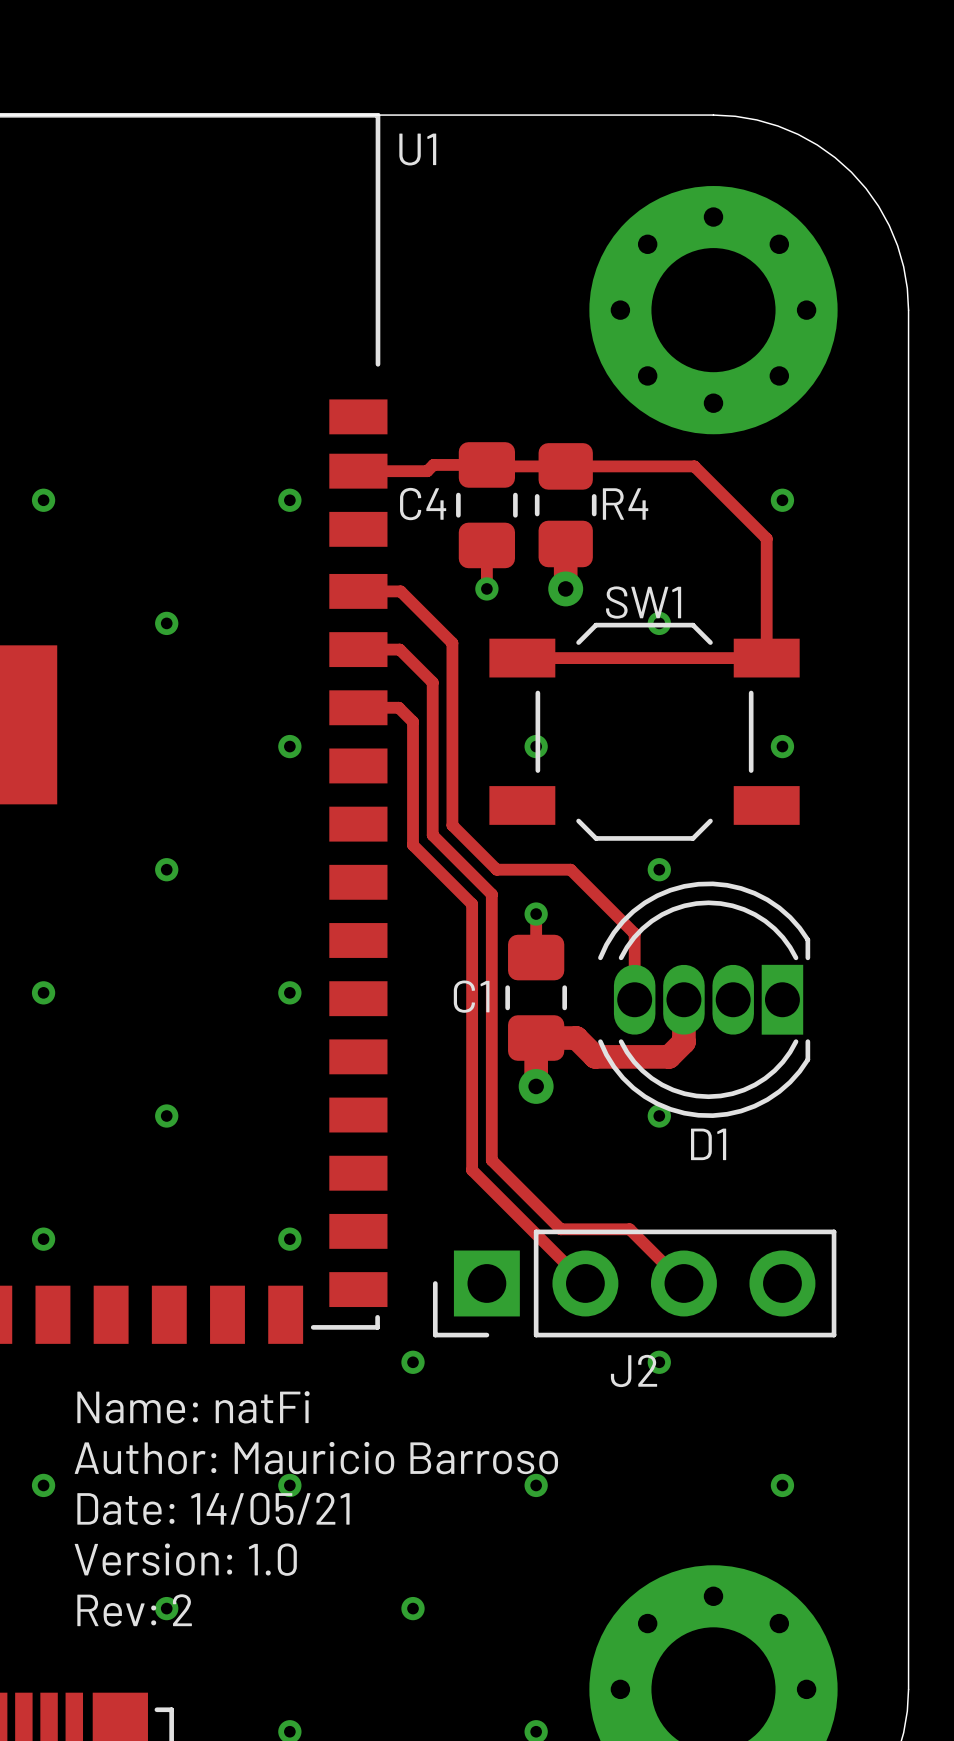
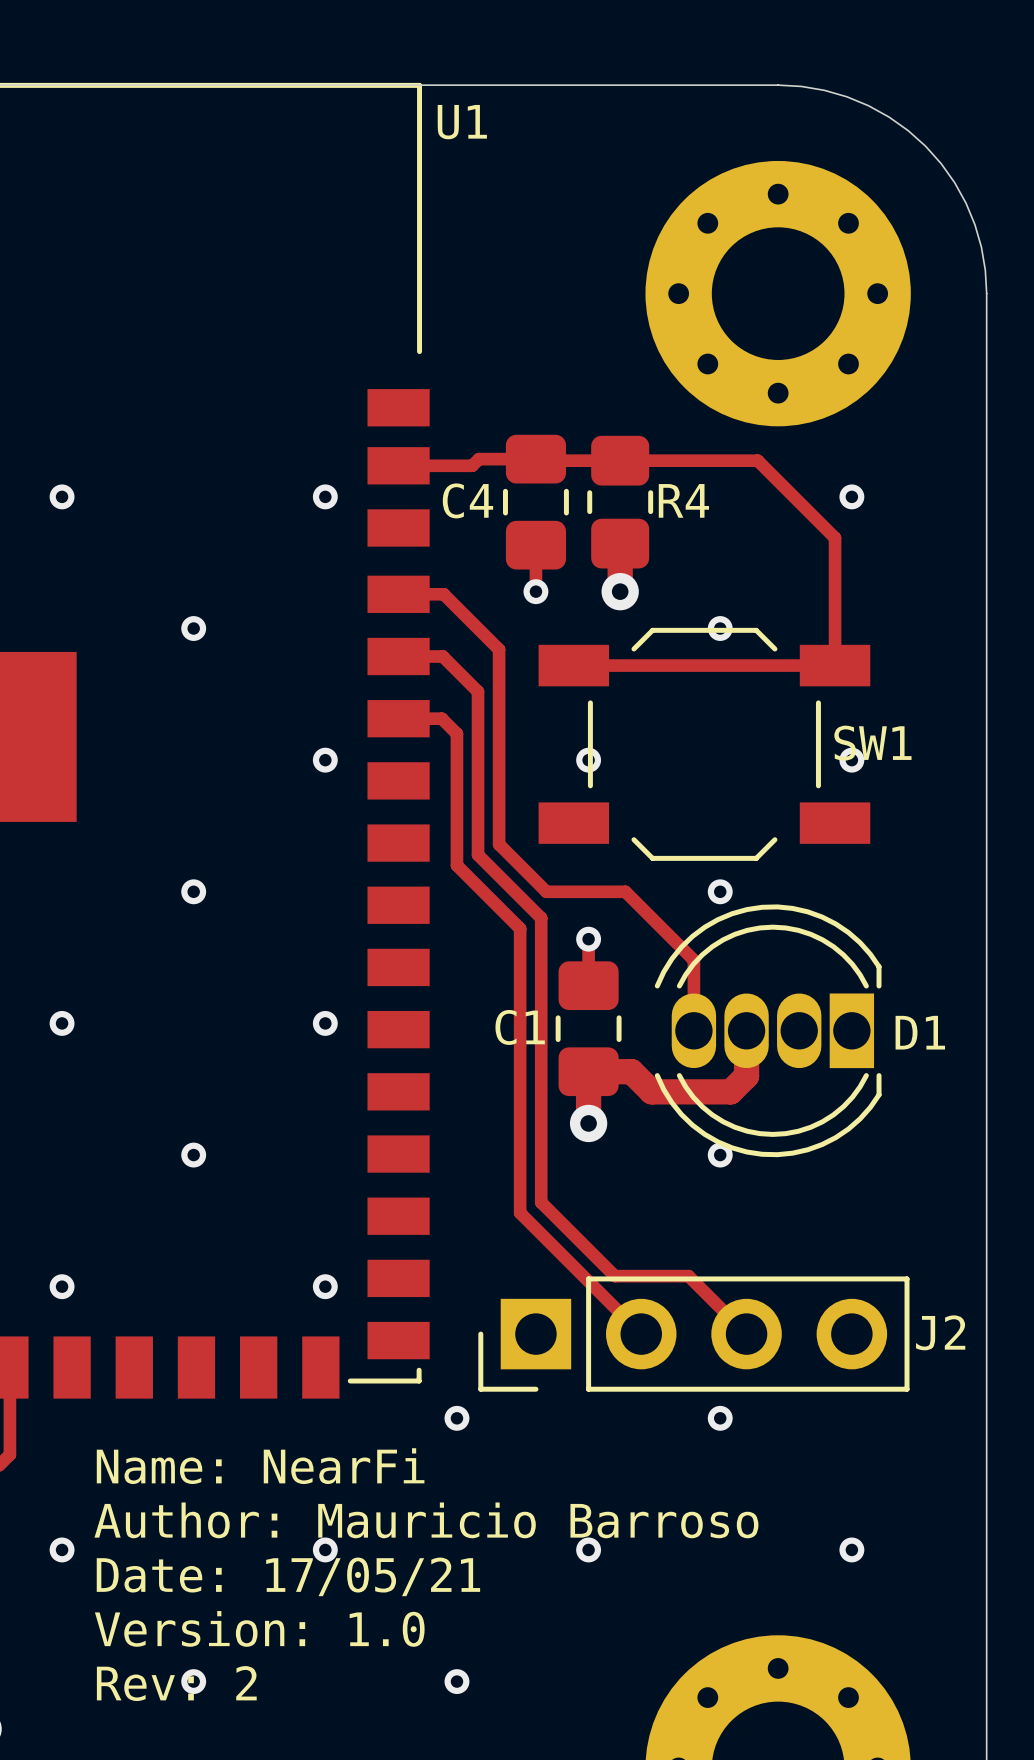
SW1 name position: SW1 (643, 602) -> SW1 (872, 743)
D1 name position: D1 (708, 1144) -> D1 (920, 1032)
J2 name position: J2 (634, 1370) -> J2 (940, 1332)
text: Name: natFi (193, 1407) -> Name: NearFi (260, 1466)
text: Date: 14/05/21 (213, 1508) -> Date: 17/05/21 (288, 1576)

